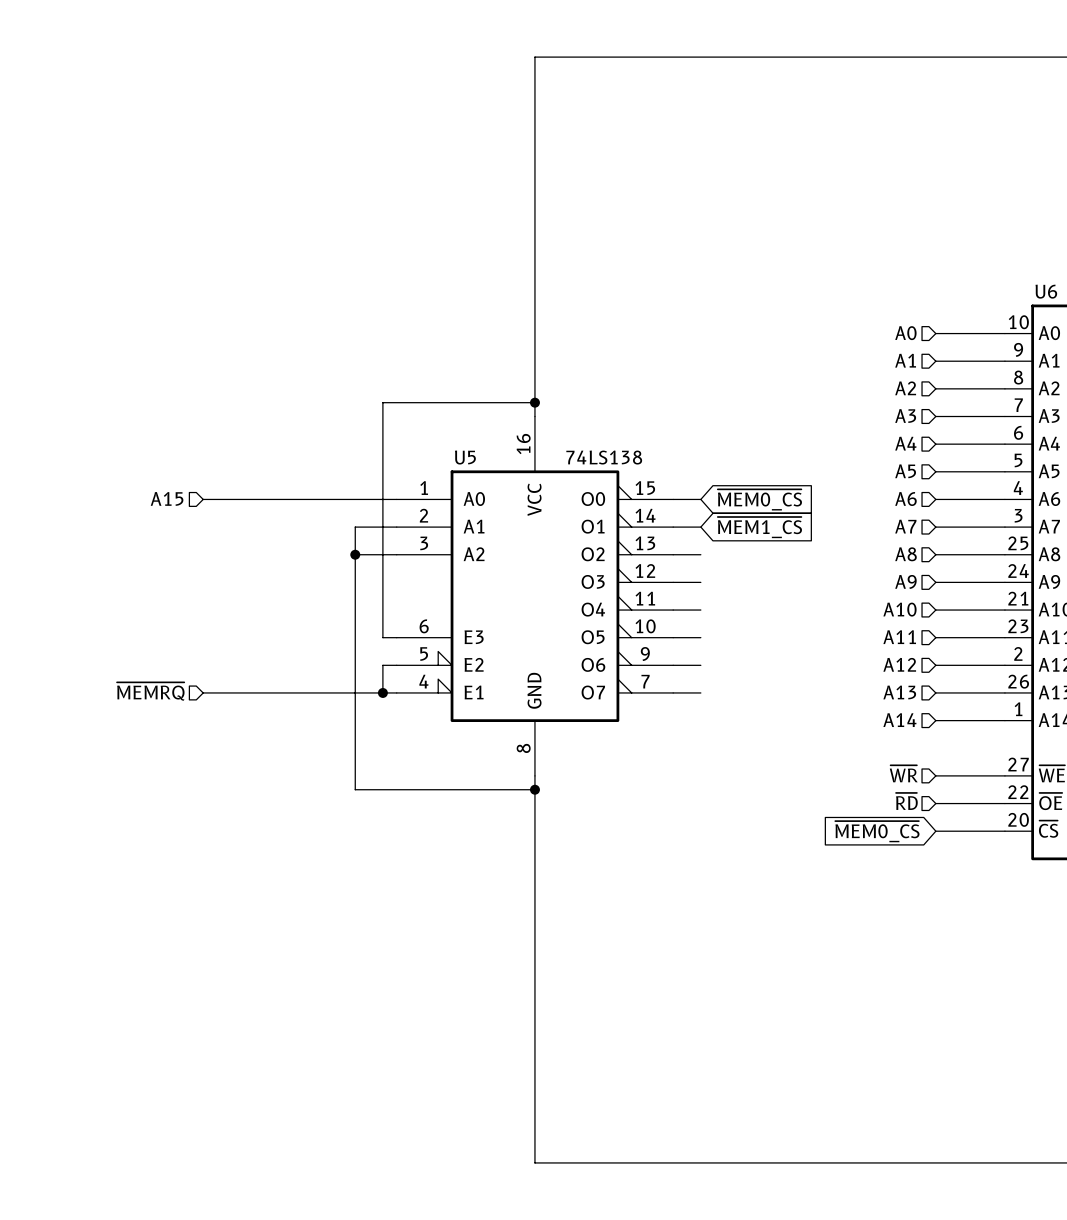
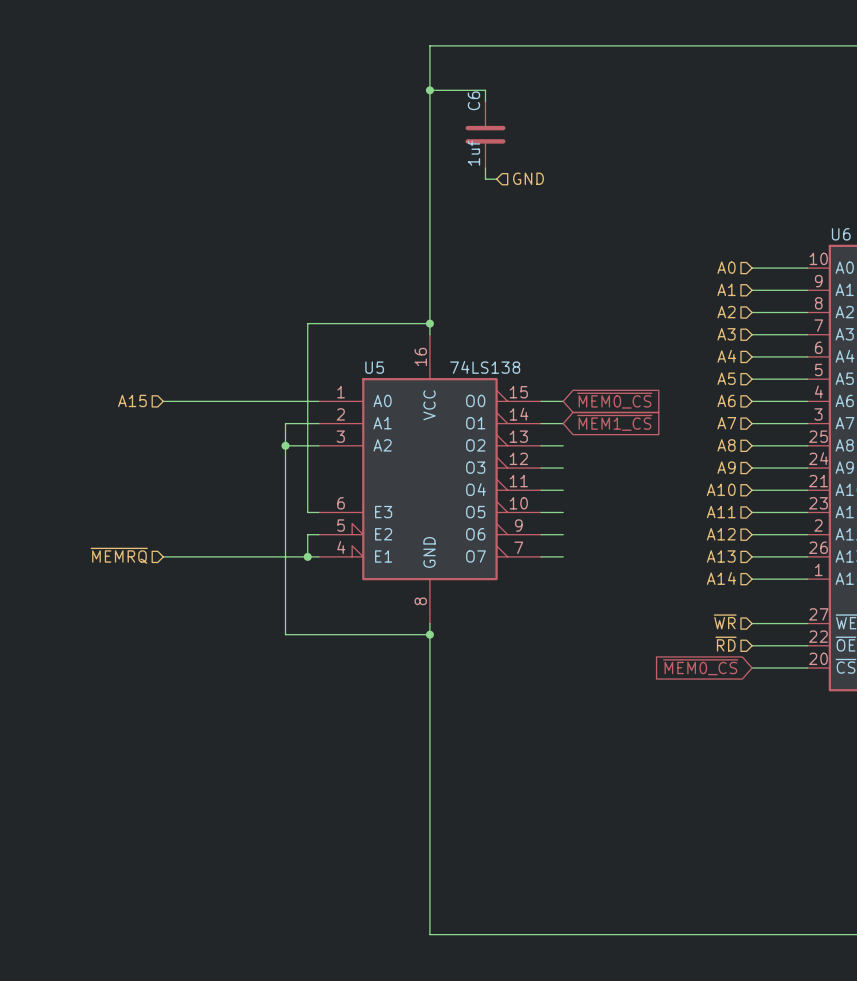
wire: none -> (429, 90) (485, 90) (485, 101)
junction: none -> (429, 90)
C6: none -> 1uf (485, 134)
wire: none -> (485, 168) (485, 179) (496, 179)
hierarchical label: none -> GND (528, 178)

